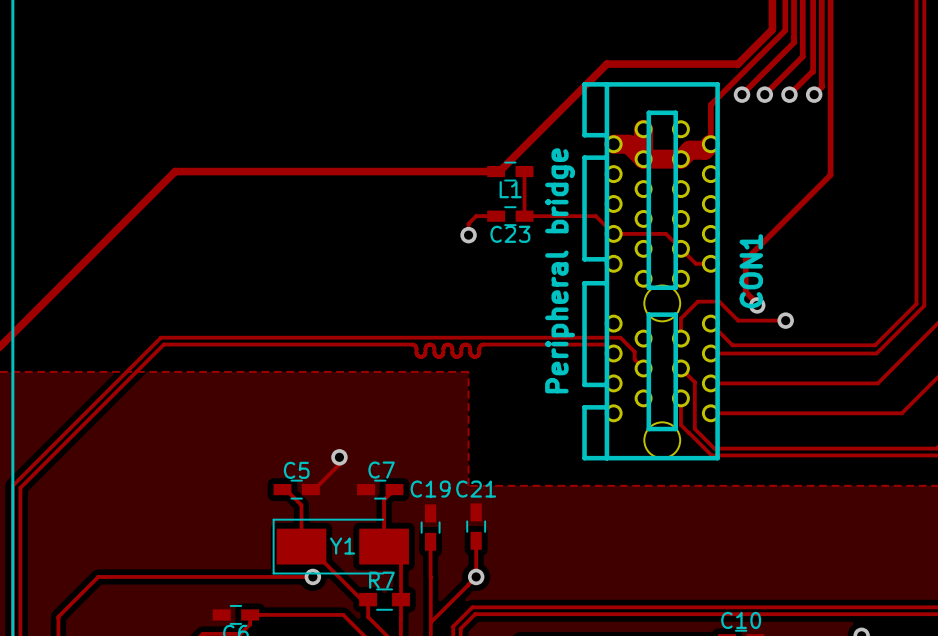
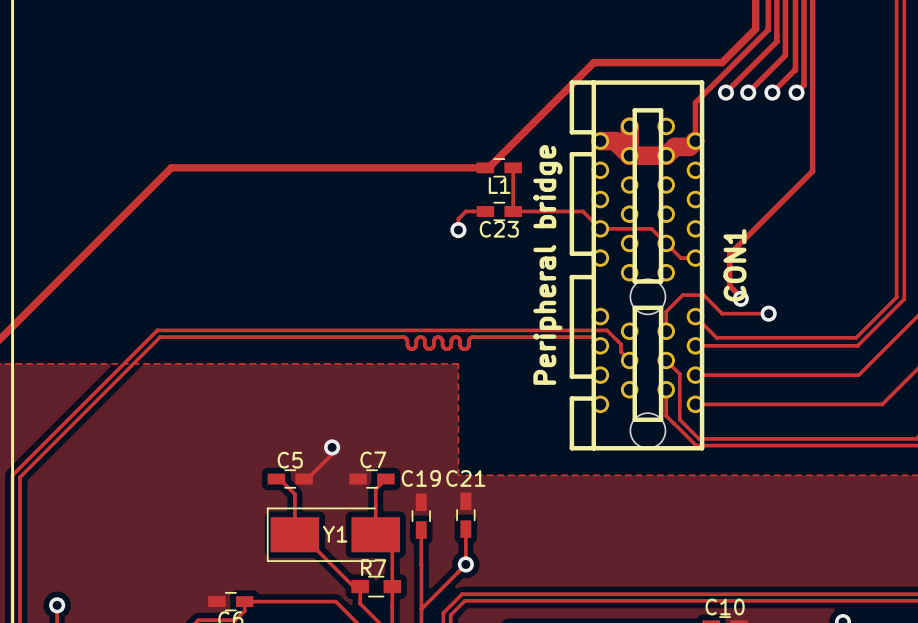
track: (312, 576) (98, 576) (58, 618) -> none
via: (312, 576) -> none
via: none -> (57, 605)

